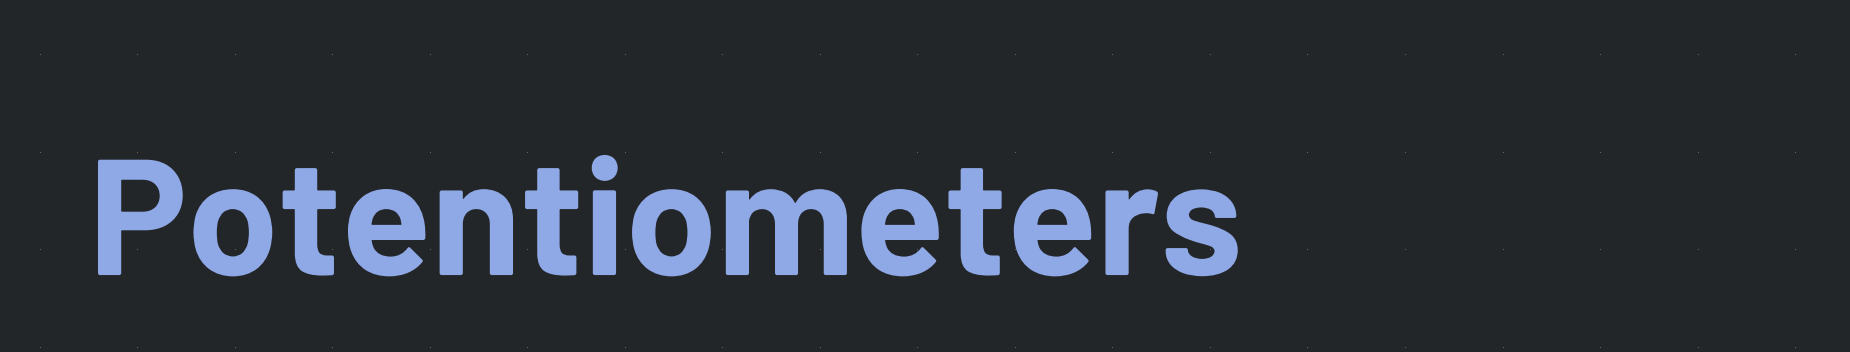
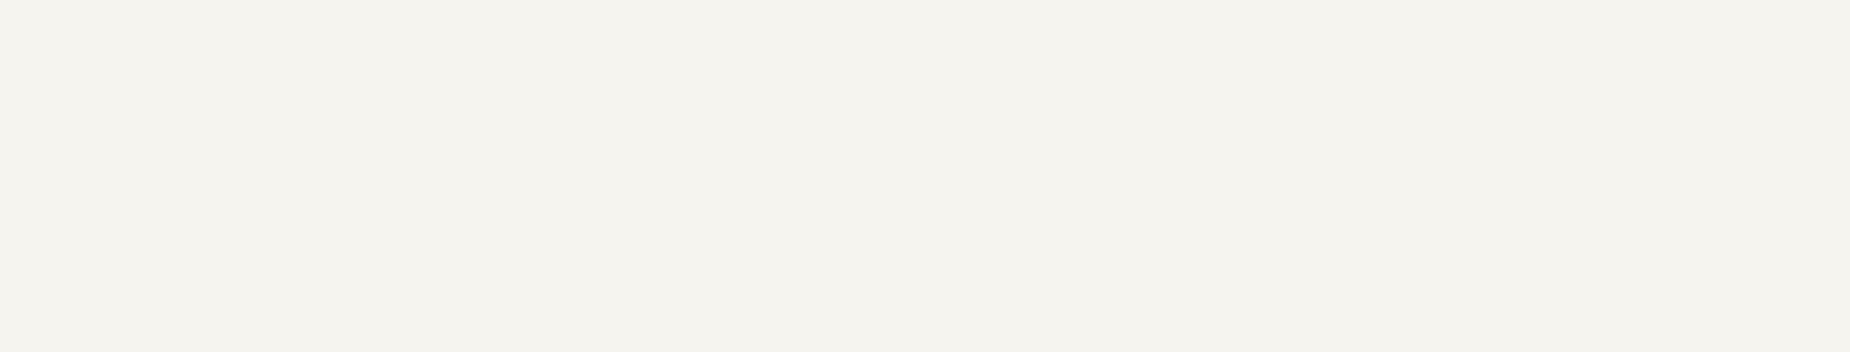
text: Potentiometers (667, 215) -> none

